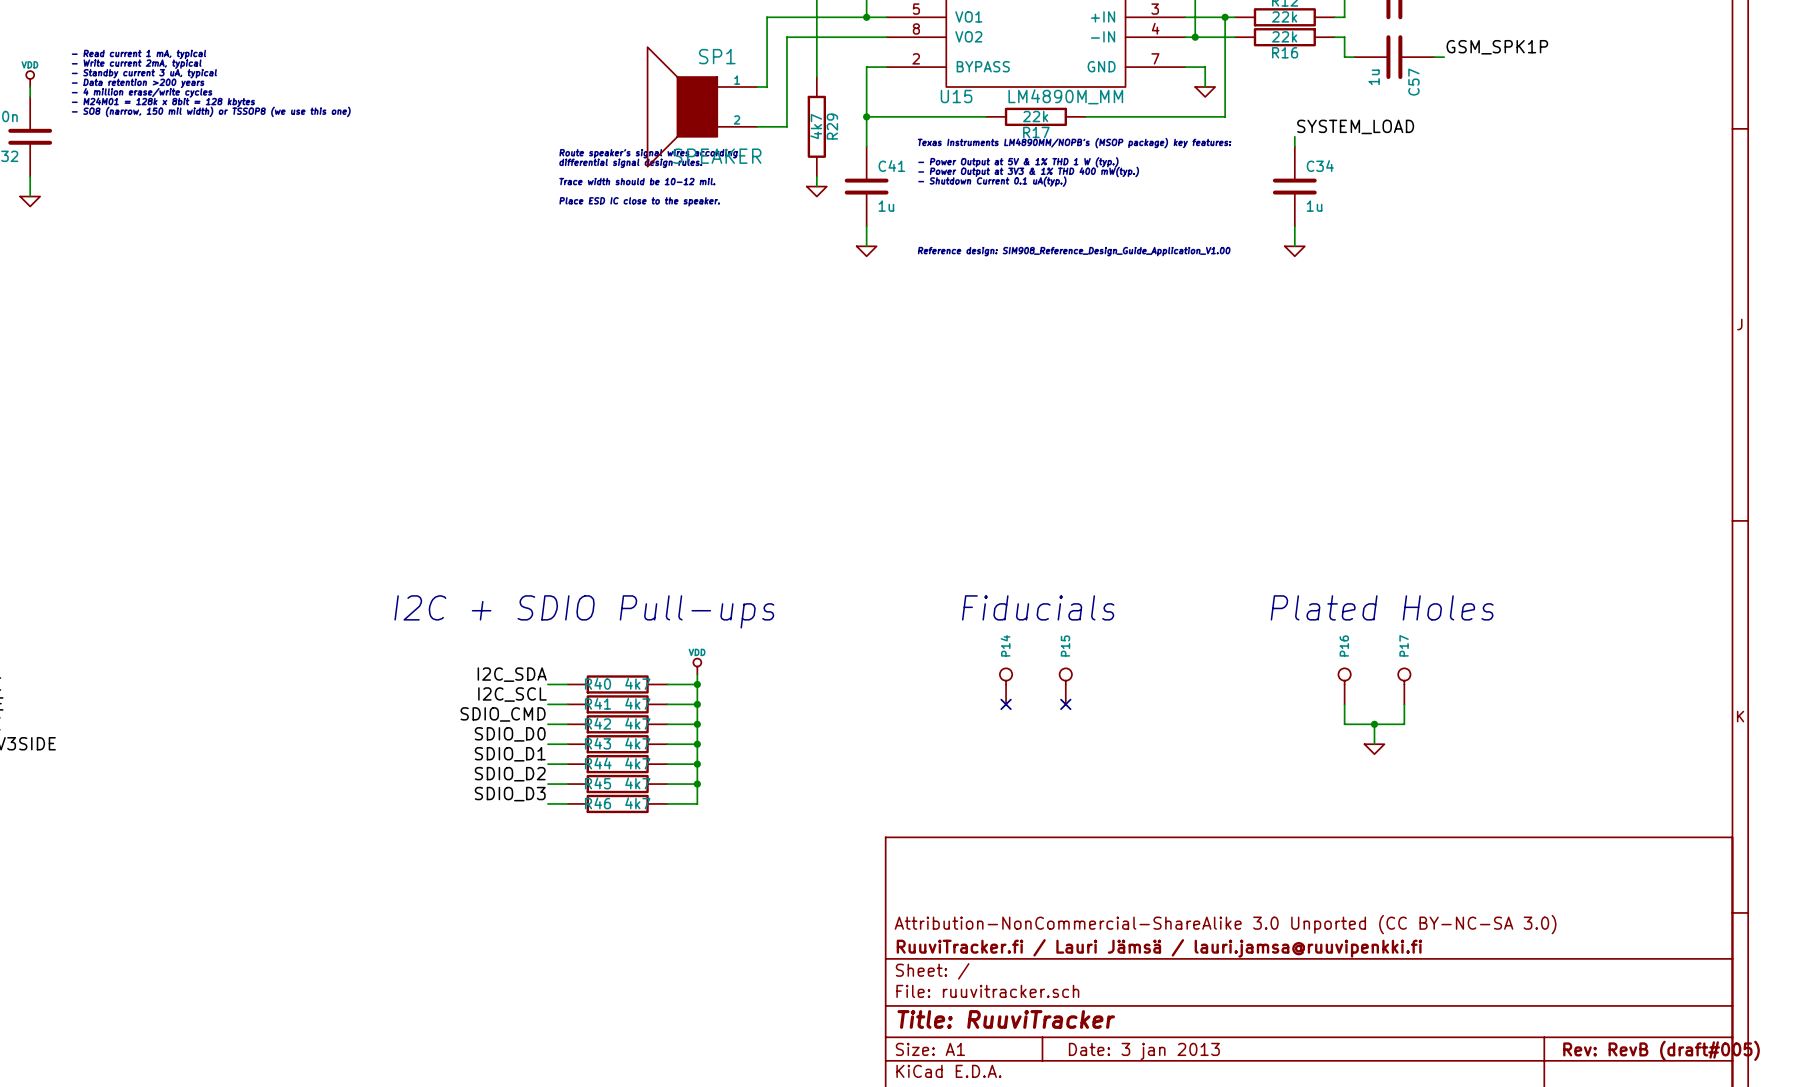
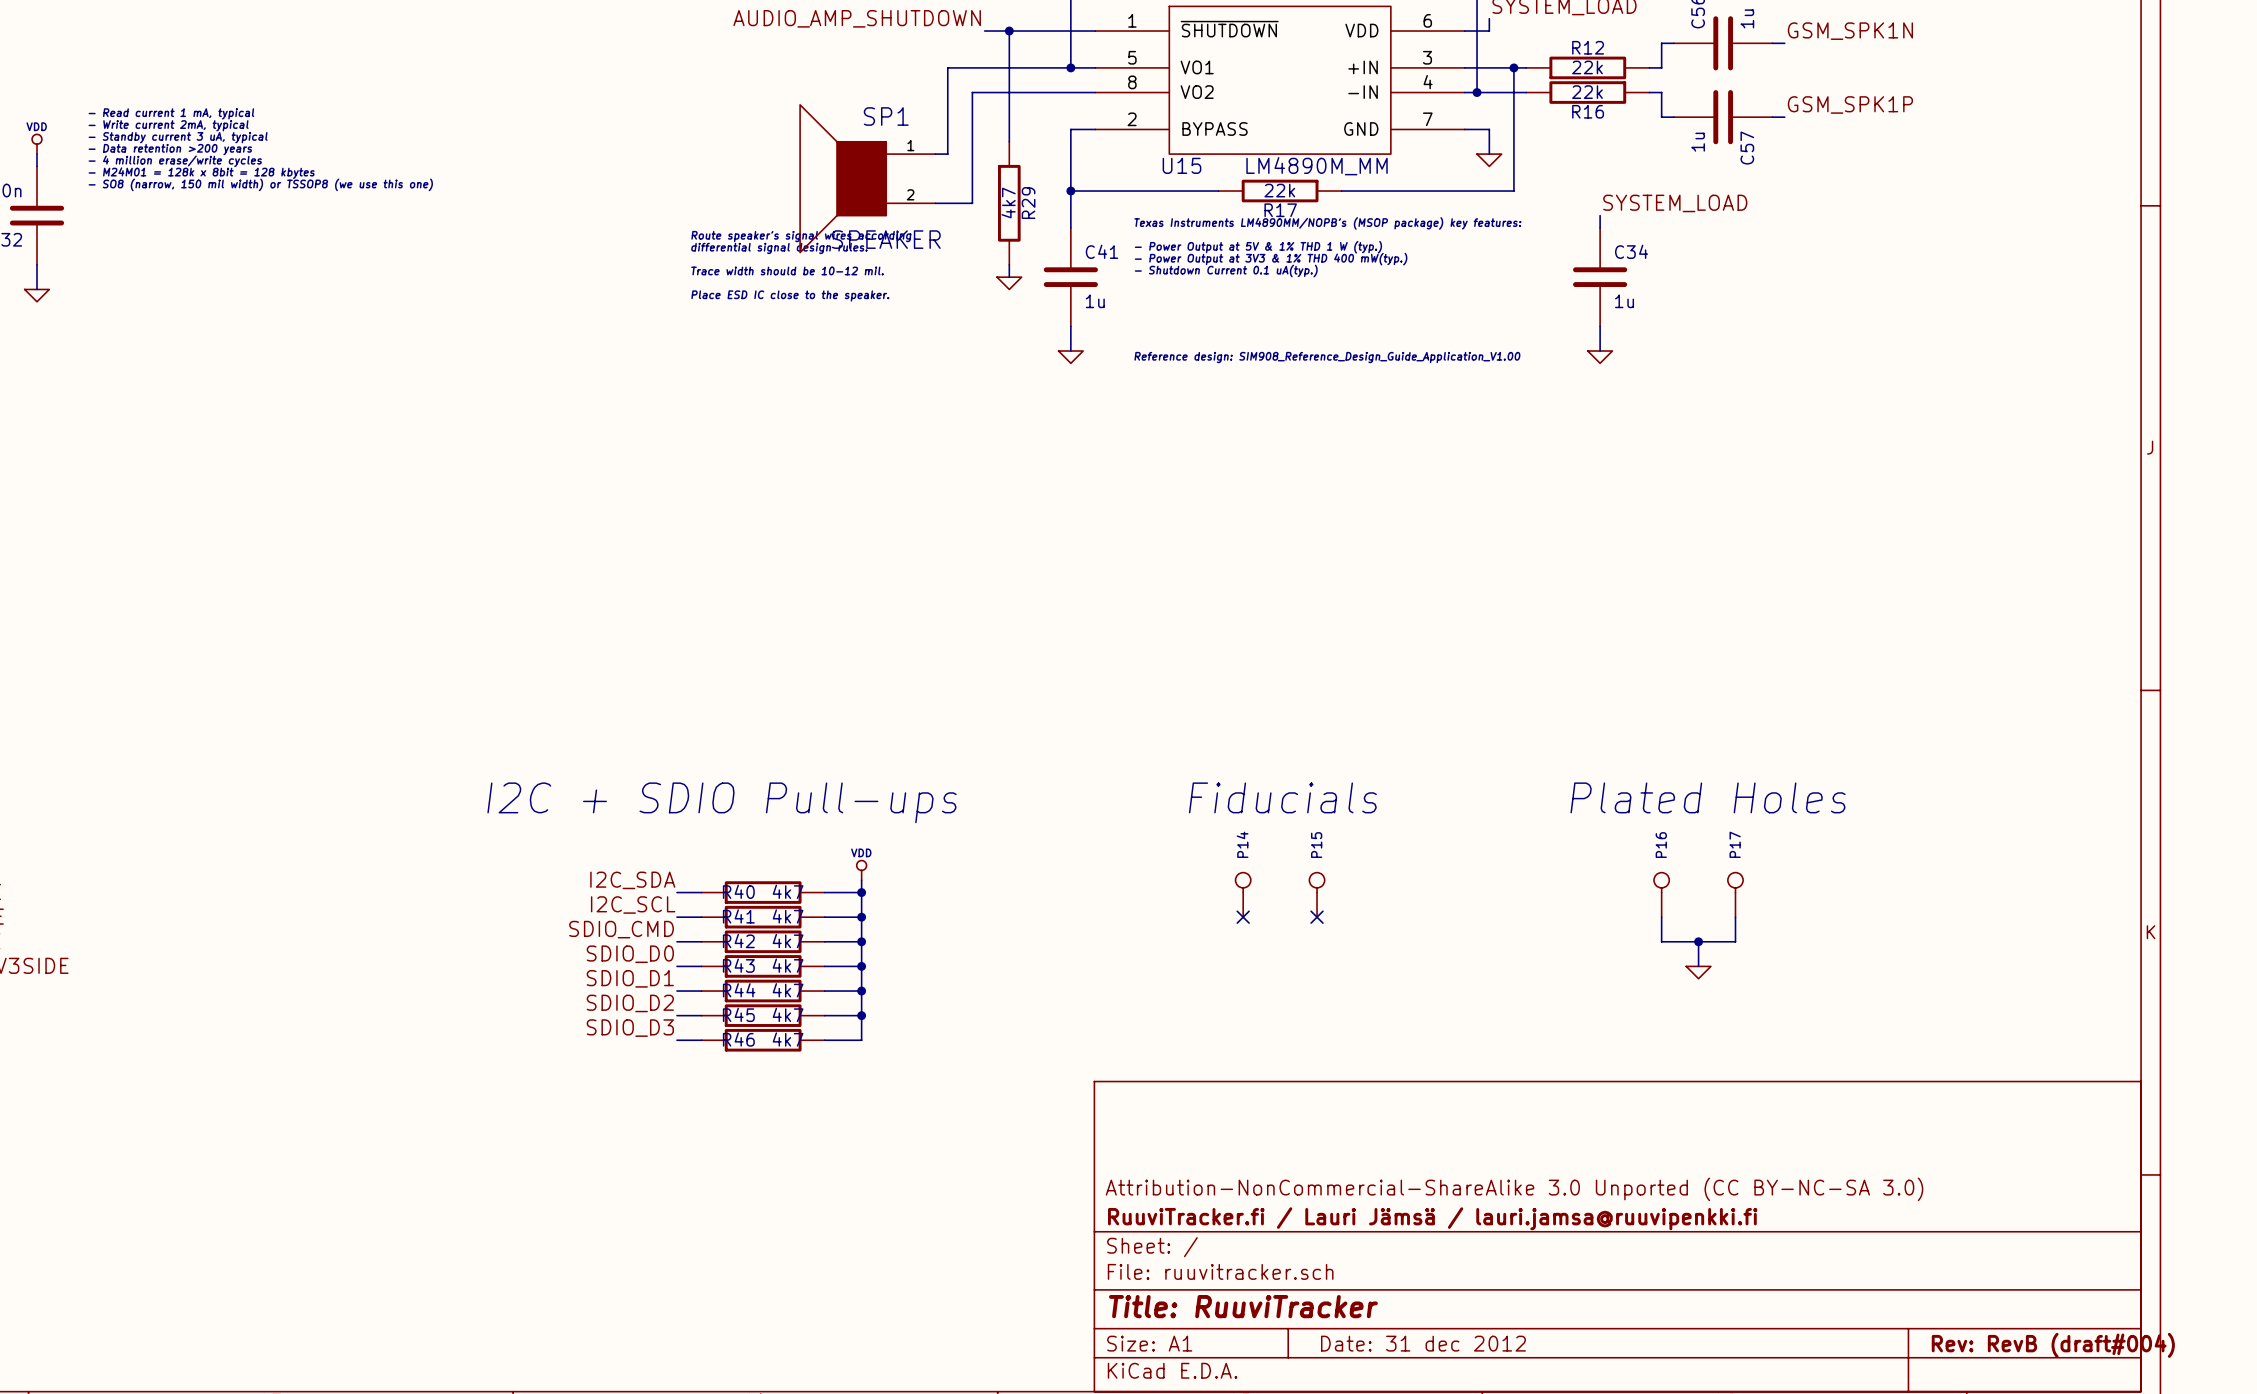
title block: Rev: RevB (draft#005) (1661, 1050) -> Rev: RevB (draft#004) (2053, 1345)
title block: Date: 3 jan 2013 (1144, 1051) -> Date: 31 dec 2012 (1423, 1343)

